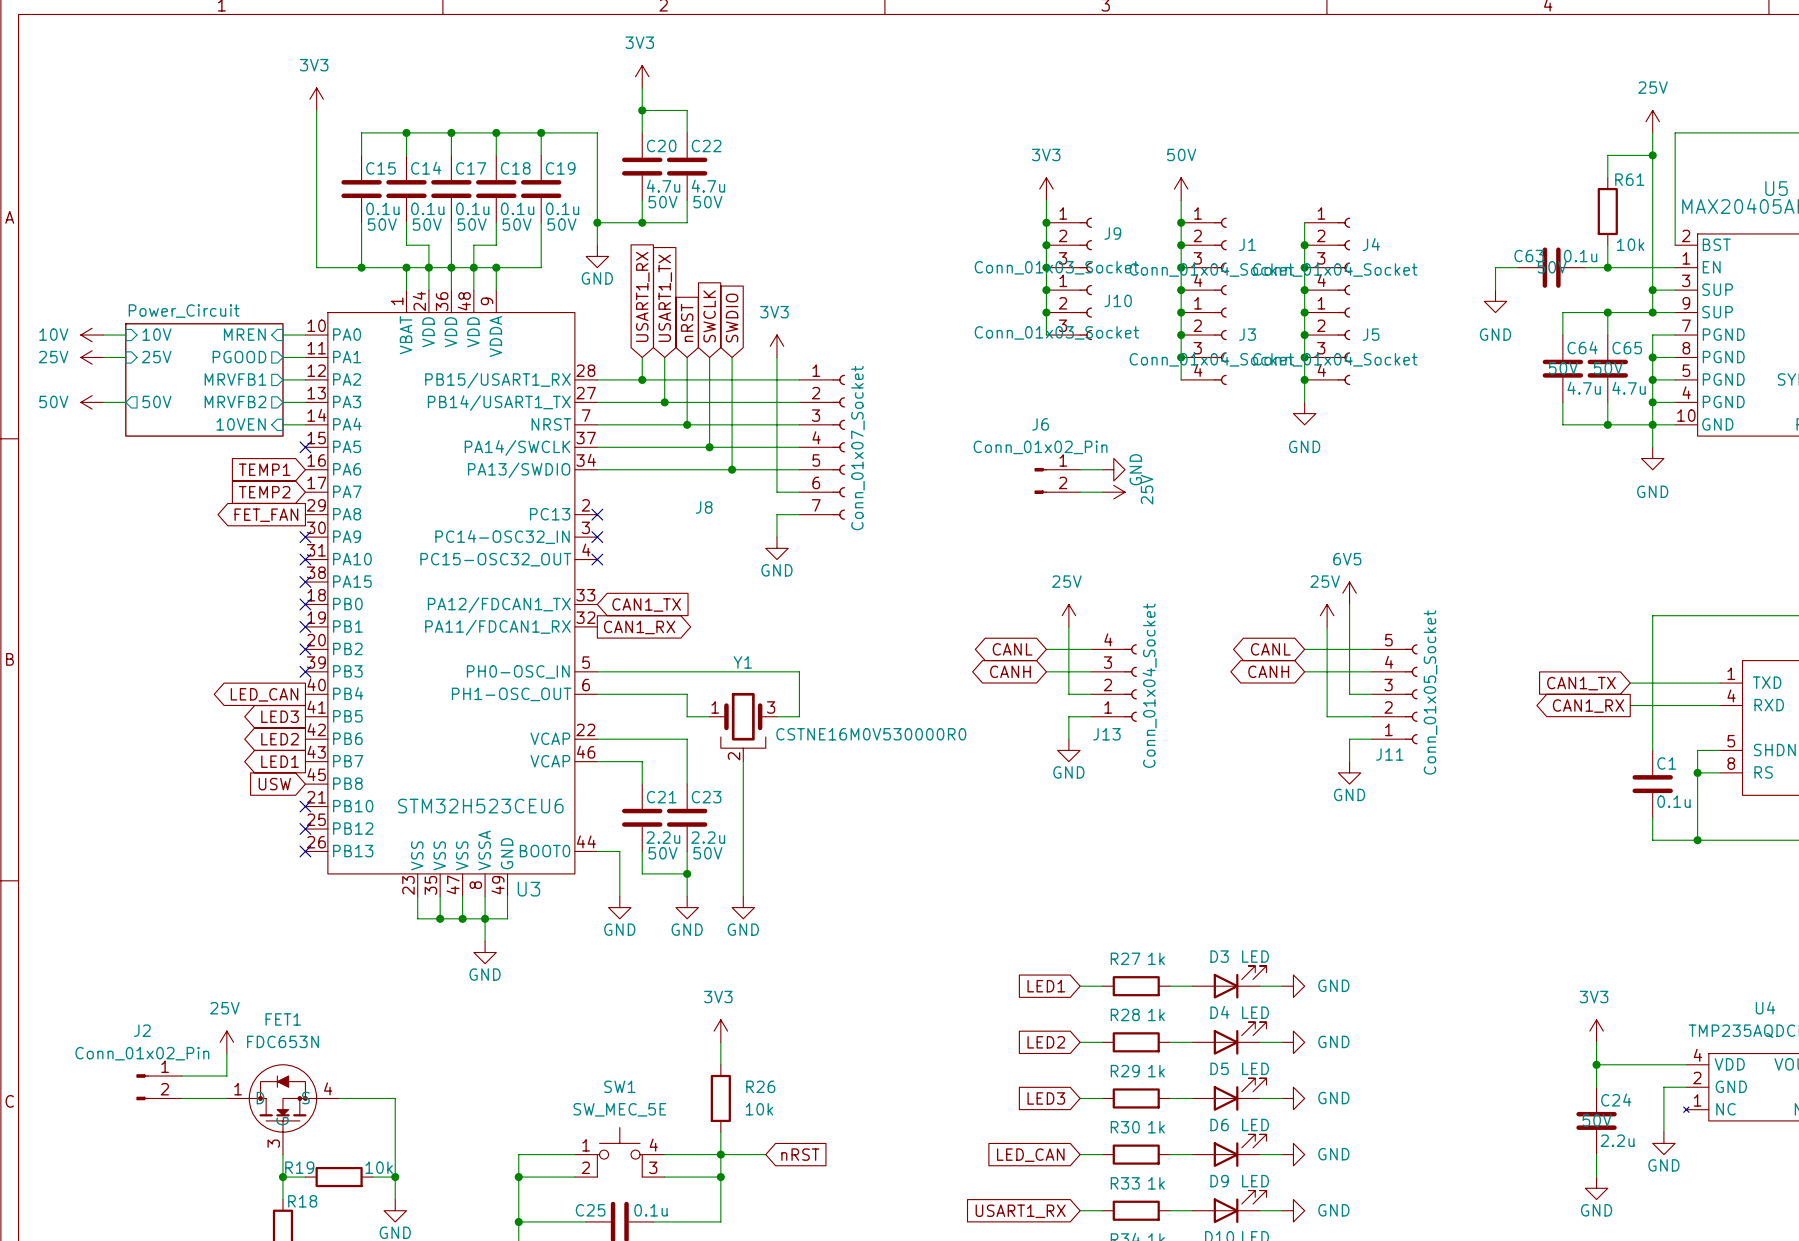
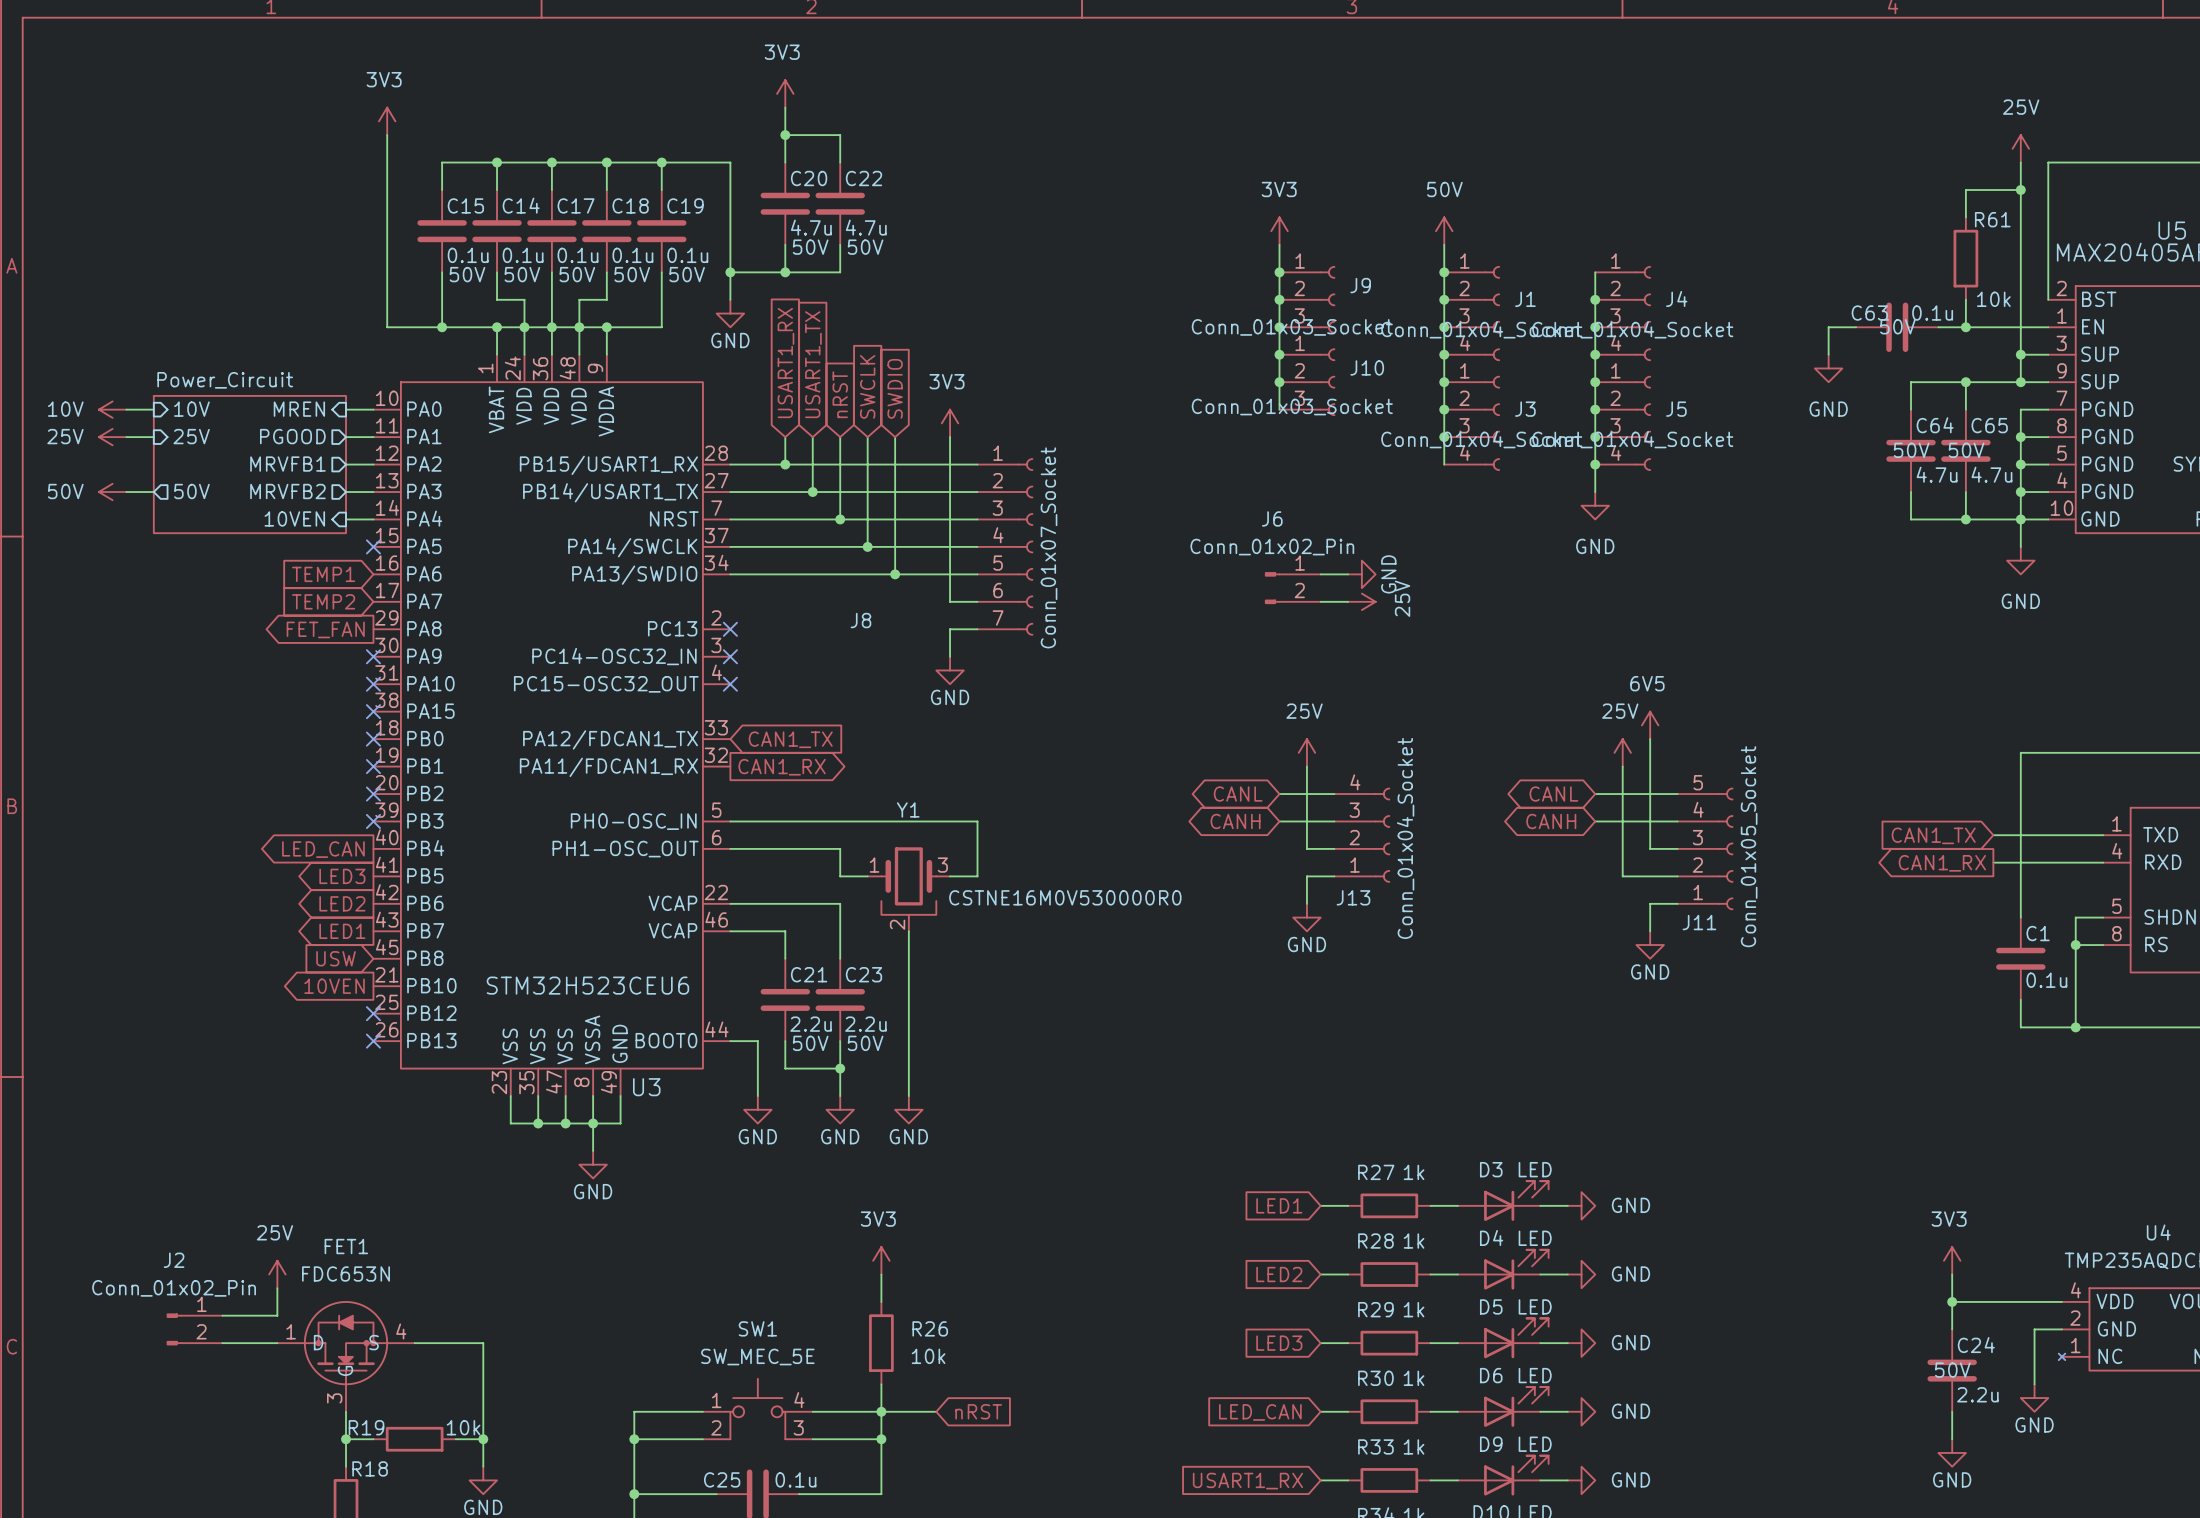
global label: none -> 10VEN (334, 986)
no-connect mark: (305, 806) -> none

